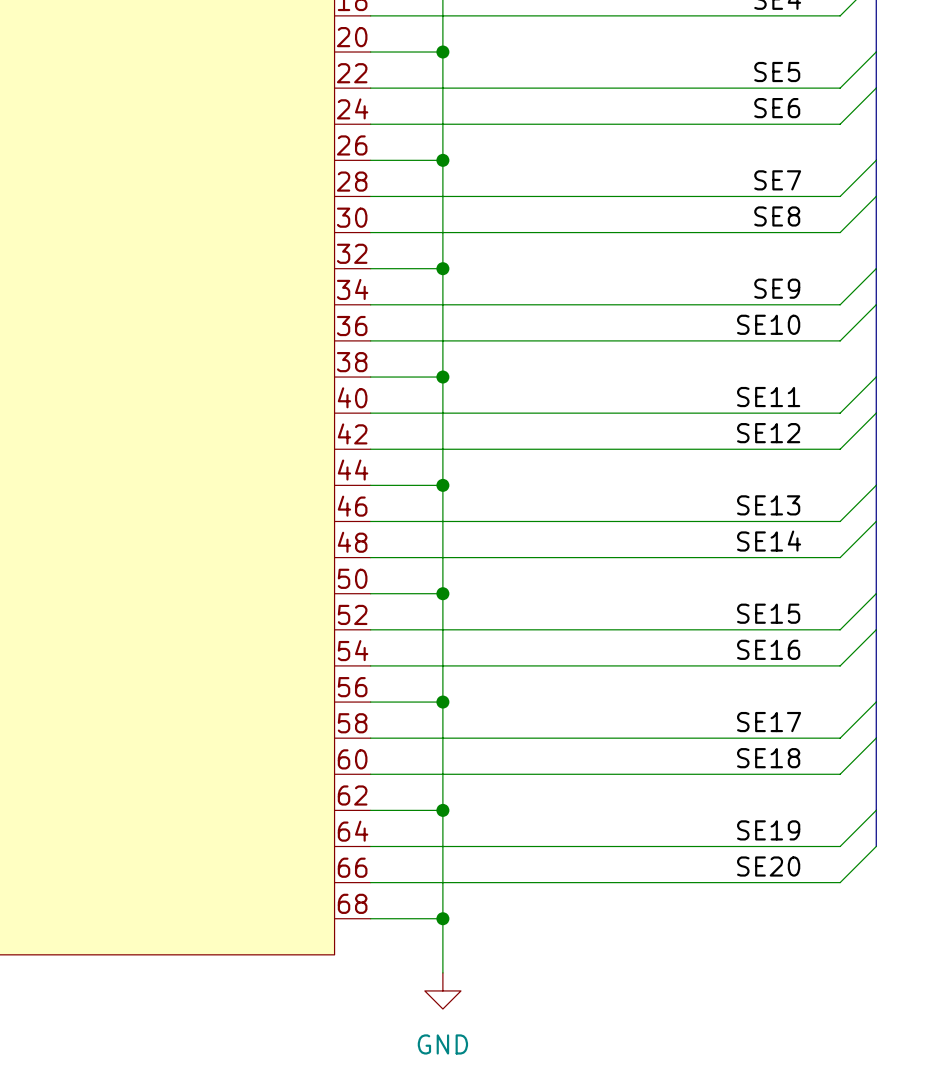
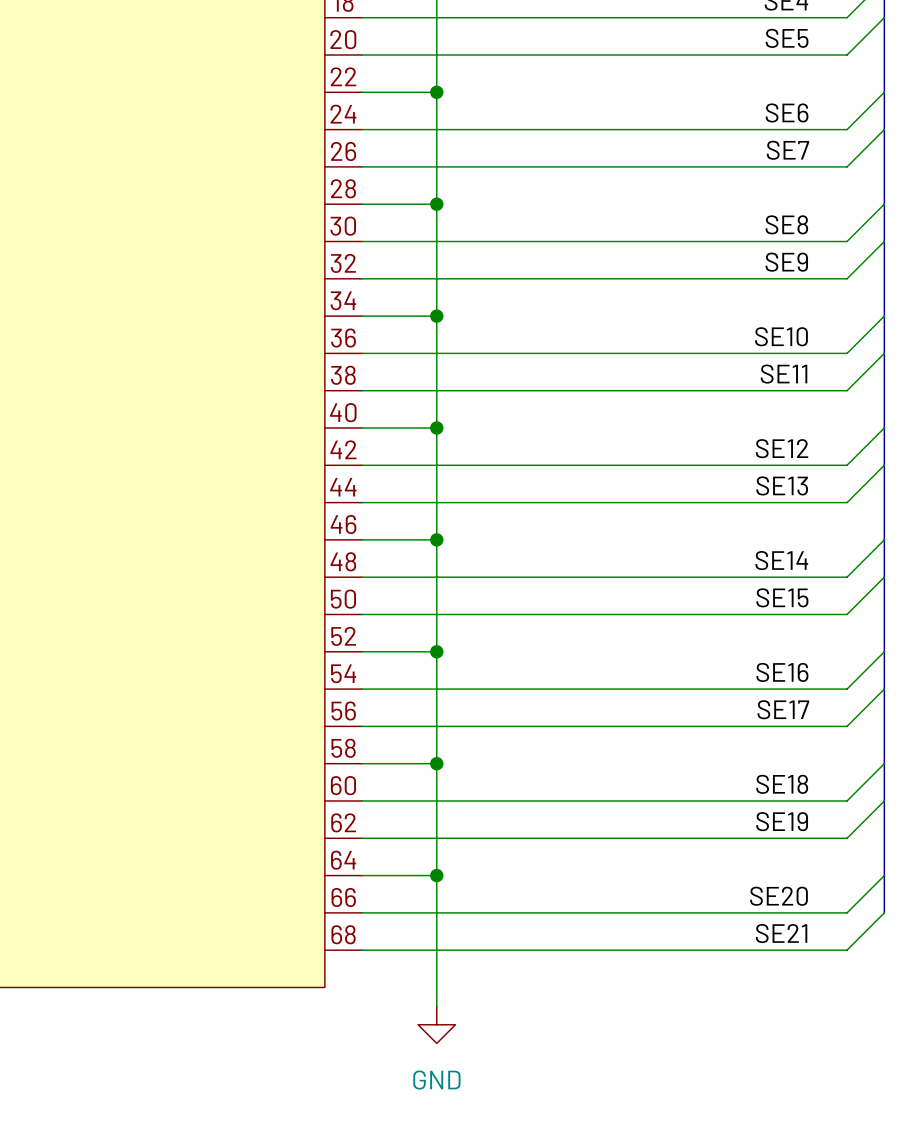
junction: (442, 52) -> none
wire: (876, 52) (840, 88) (442, 88) -> (884, 17) (847, 55) (436, 55)
label position: SE5 (777, 72) -> SE5 (787, 38)
junction: none -> (436, 92)
junction: (442, 160) -> none
wire: (876, 160) (840, 196) (442, 196) -> (884, 129) (847, 166) (436, 166)
label position: SE7 (777, 180) -> SE7 (788, 150)
junction: none -> (436, 204)
junction: (442, 268) -> none
wire: (876, 268) (840, 304) (442, 304) -> (884, 241) (847, 278) (436, 278)
label position: SE9 (777, 288) -> SE9 (786, 262)
junction: none -> (436, 316)
junction: (442, 377) -> none
wire: (876, 377) (840, 413) (442, 413) -> (884, 353) (847, 390) (436, 390)
label position: SE11 (768, 397) -> SE11 (784, 374)
junction: none -> (436, 428)
junction: (442, 485) -> none
wire: (876, 485) (840, 521) (442, 521) -> (884, 465) (847, 502) (436, 502)
label position: SE13 (768, 505) -> SE13 (782, 485)
junction: none -> (436, 539)
junction: (442, 593) -> none
wire: (876, 593) (840, 629) (442, 629) -> (884, 577) (847, 614) (436, 614)
label position: SE15 (768, 613) -> SE15 (782, 597)
junction: none -> (436, 651)
junction: (442, 702) -> none
wire: (876, 702) (840, 738) (442, 738) -> (884, 689) (847, 726) (436, 726)
label position: SE17 (769, 722) -> SE17 (783, 709)
junction: none -> (436, 763)
junction: (442, 810) -> none
wire: (876, 810) (840, 846) (442, 846) -> (884, 800) (847, 838) (436, 838)
label position: SE19 (768, 830) -> SE19 (782, 821)
junction: none -> (436, 875)
bus: none -> (884, 875) (884, 912)
wire: none -> (884, 912) (847, 950) (436, 950)
label: none -> SE21 (781, 933)
junction: (442, 918) -> none

